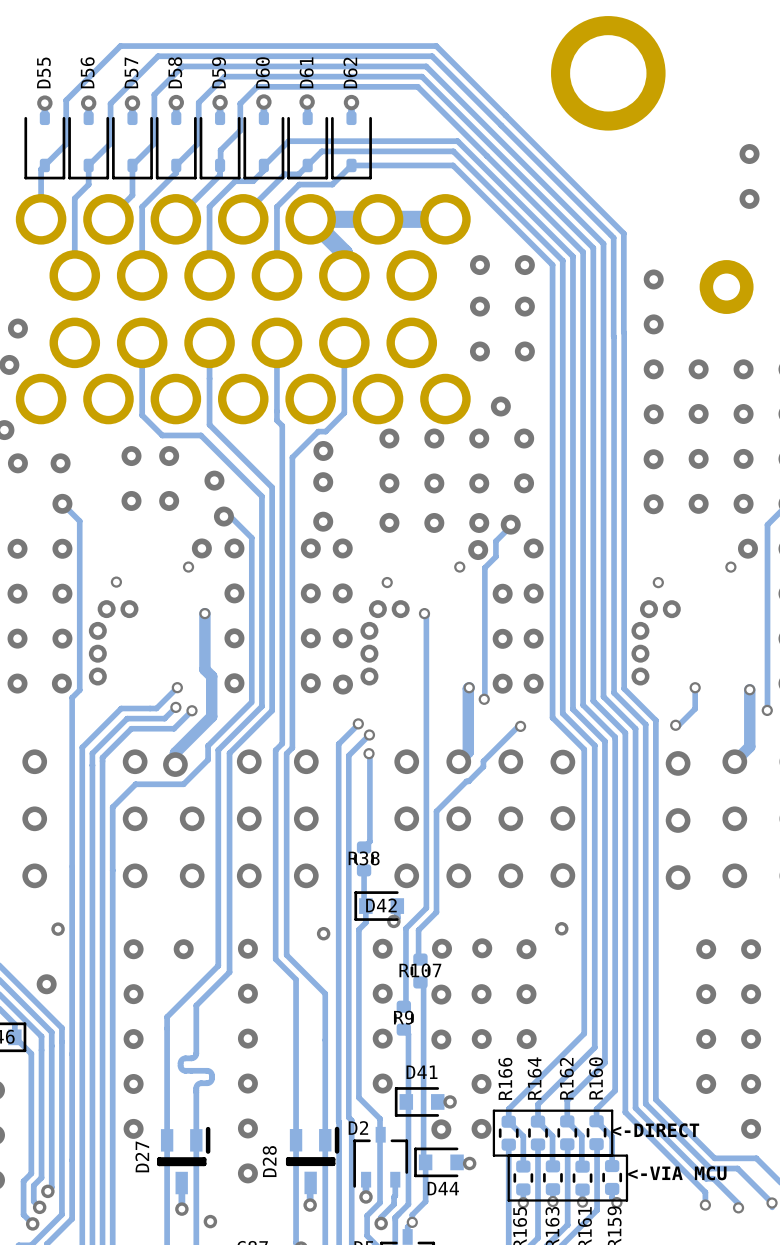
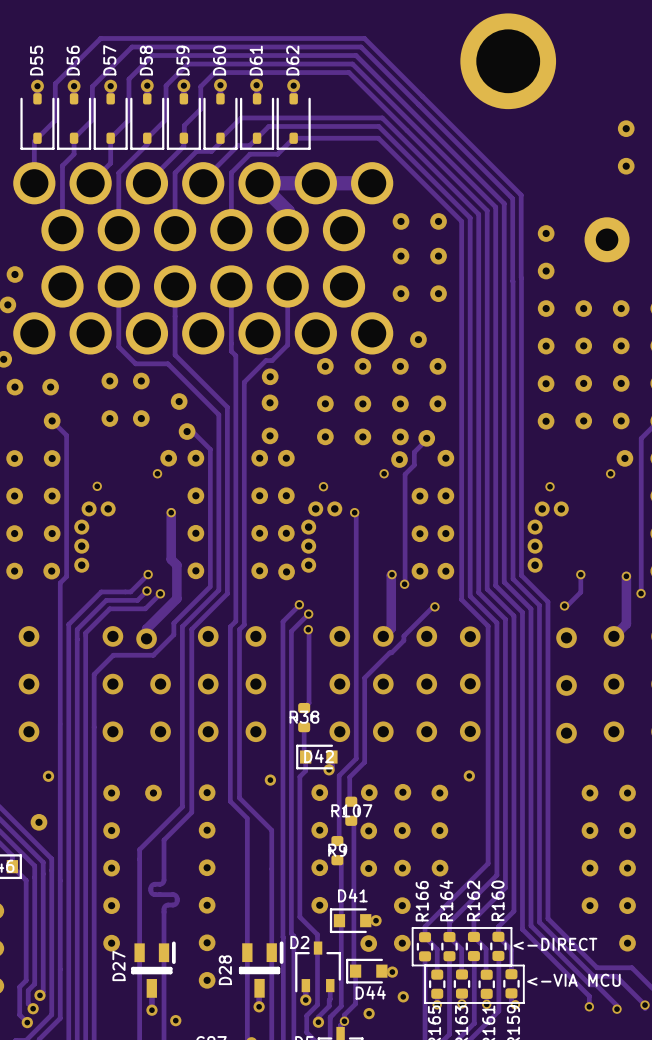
via: none -> (403, 996)
via: none -> (369, 1013)

